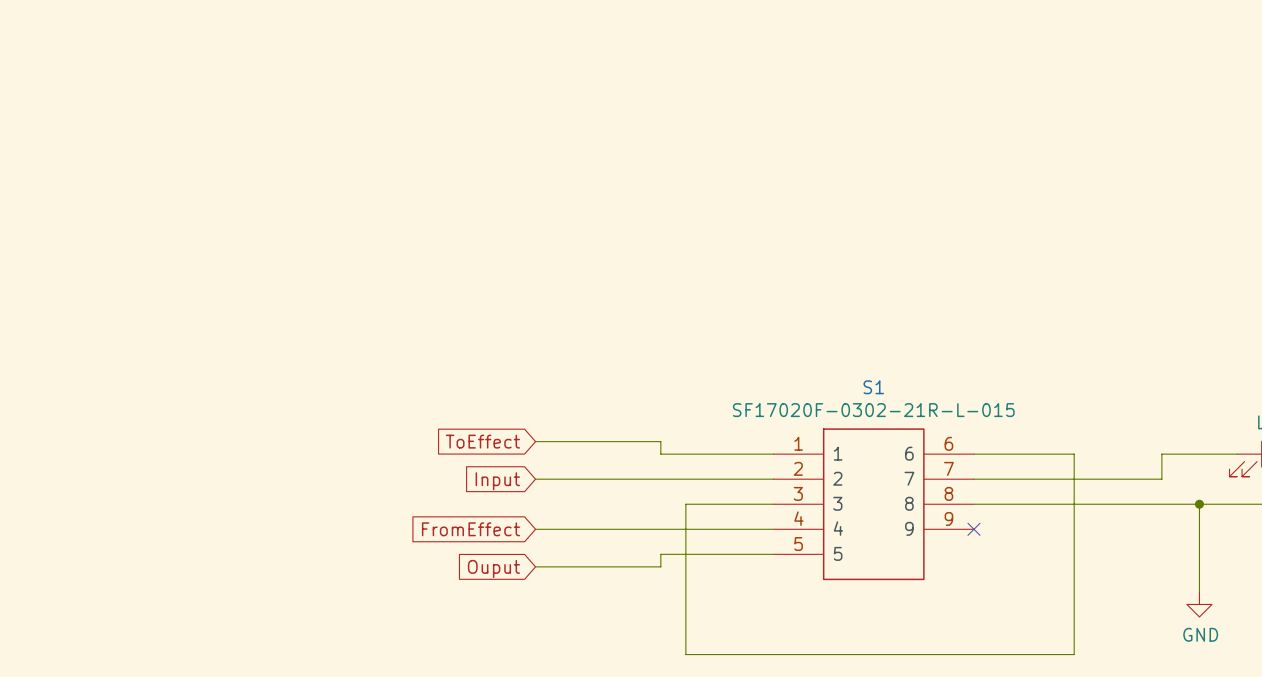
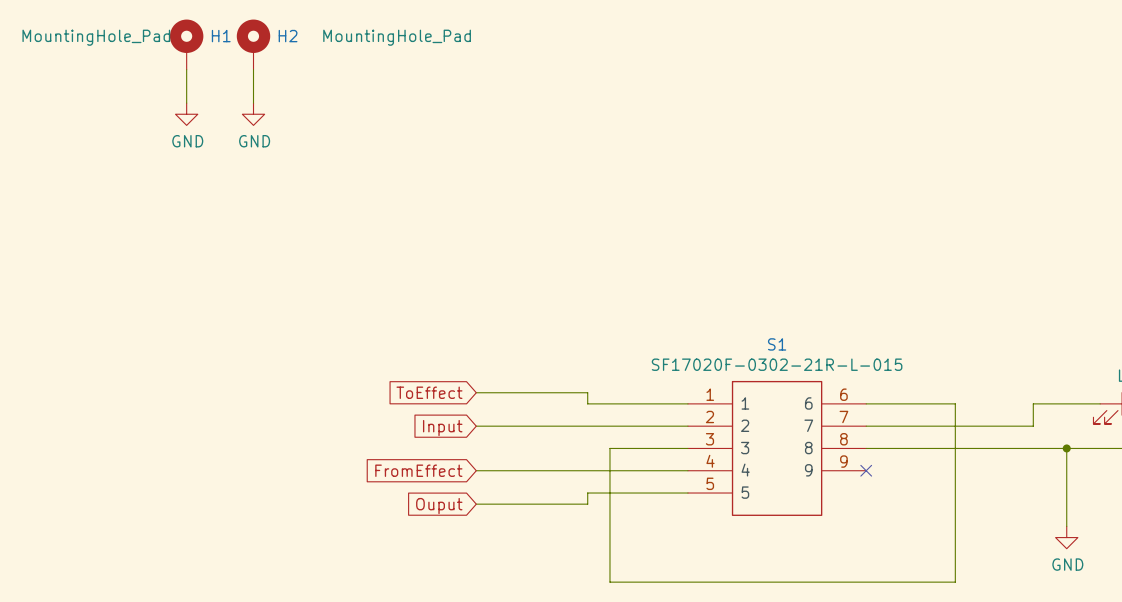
H1: none -> MountingHole_Pad (186, 44)
H2: none -> MountingHole_Pad (253, 44)
wire: none -> (186, 69) (186, 103)
wire: none -> (253, 69) (253, 103)
power symbol: none -> GND (186, 114)
power symbol: none -> GND (253, 114)

